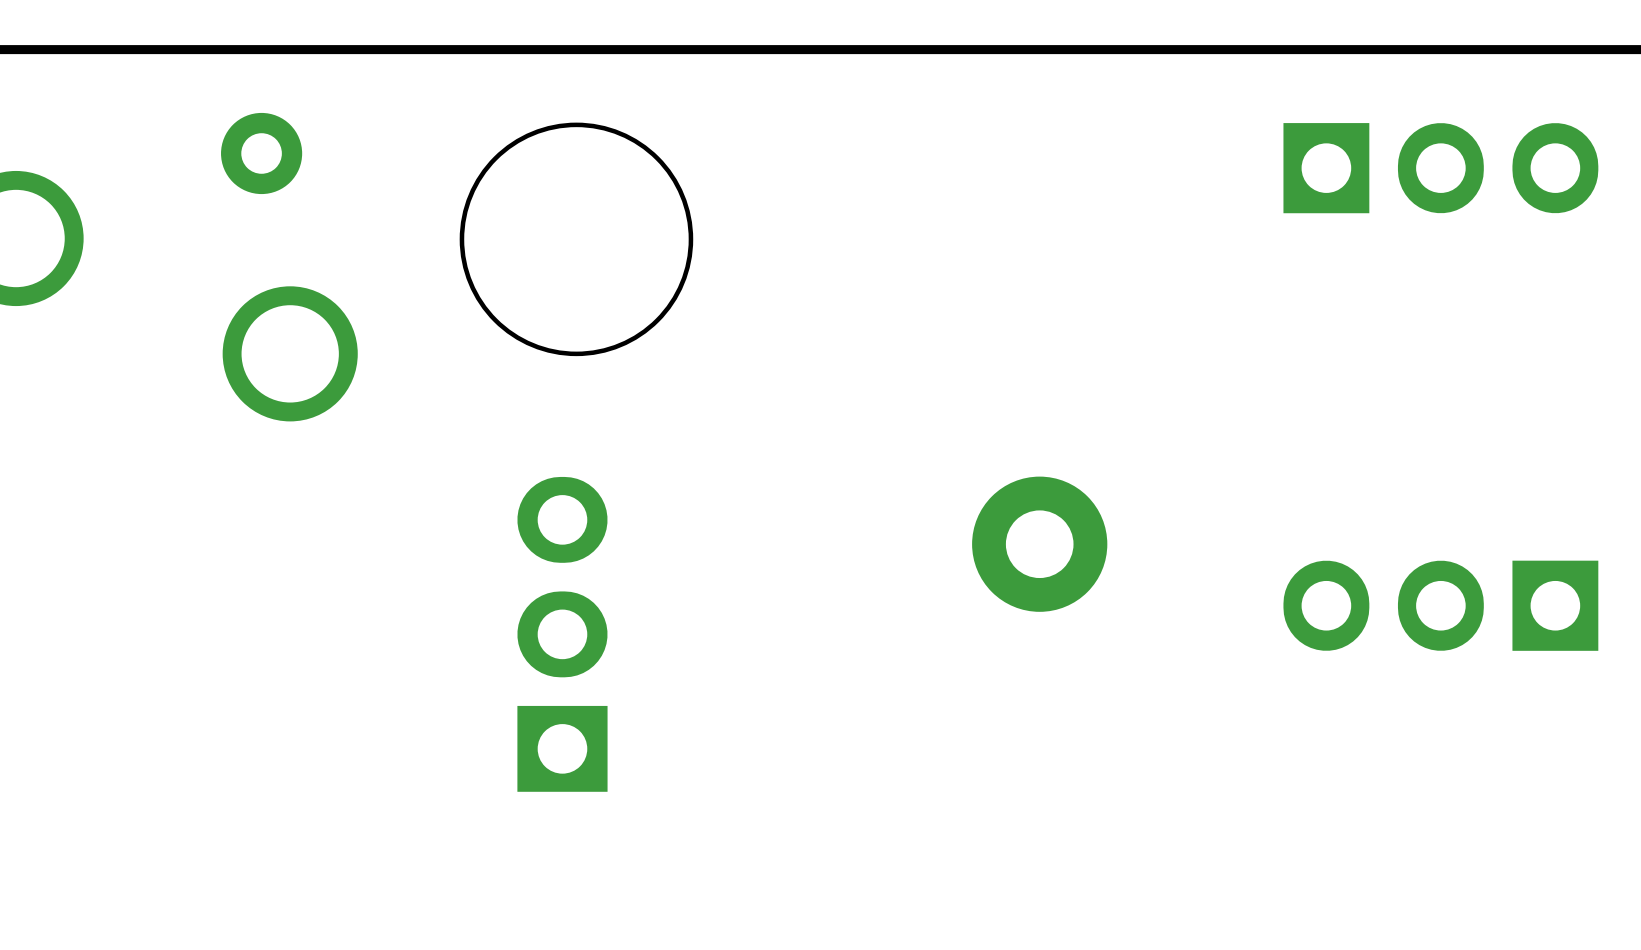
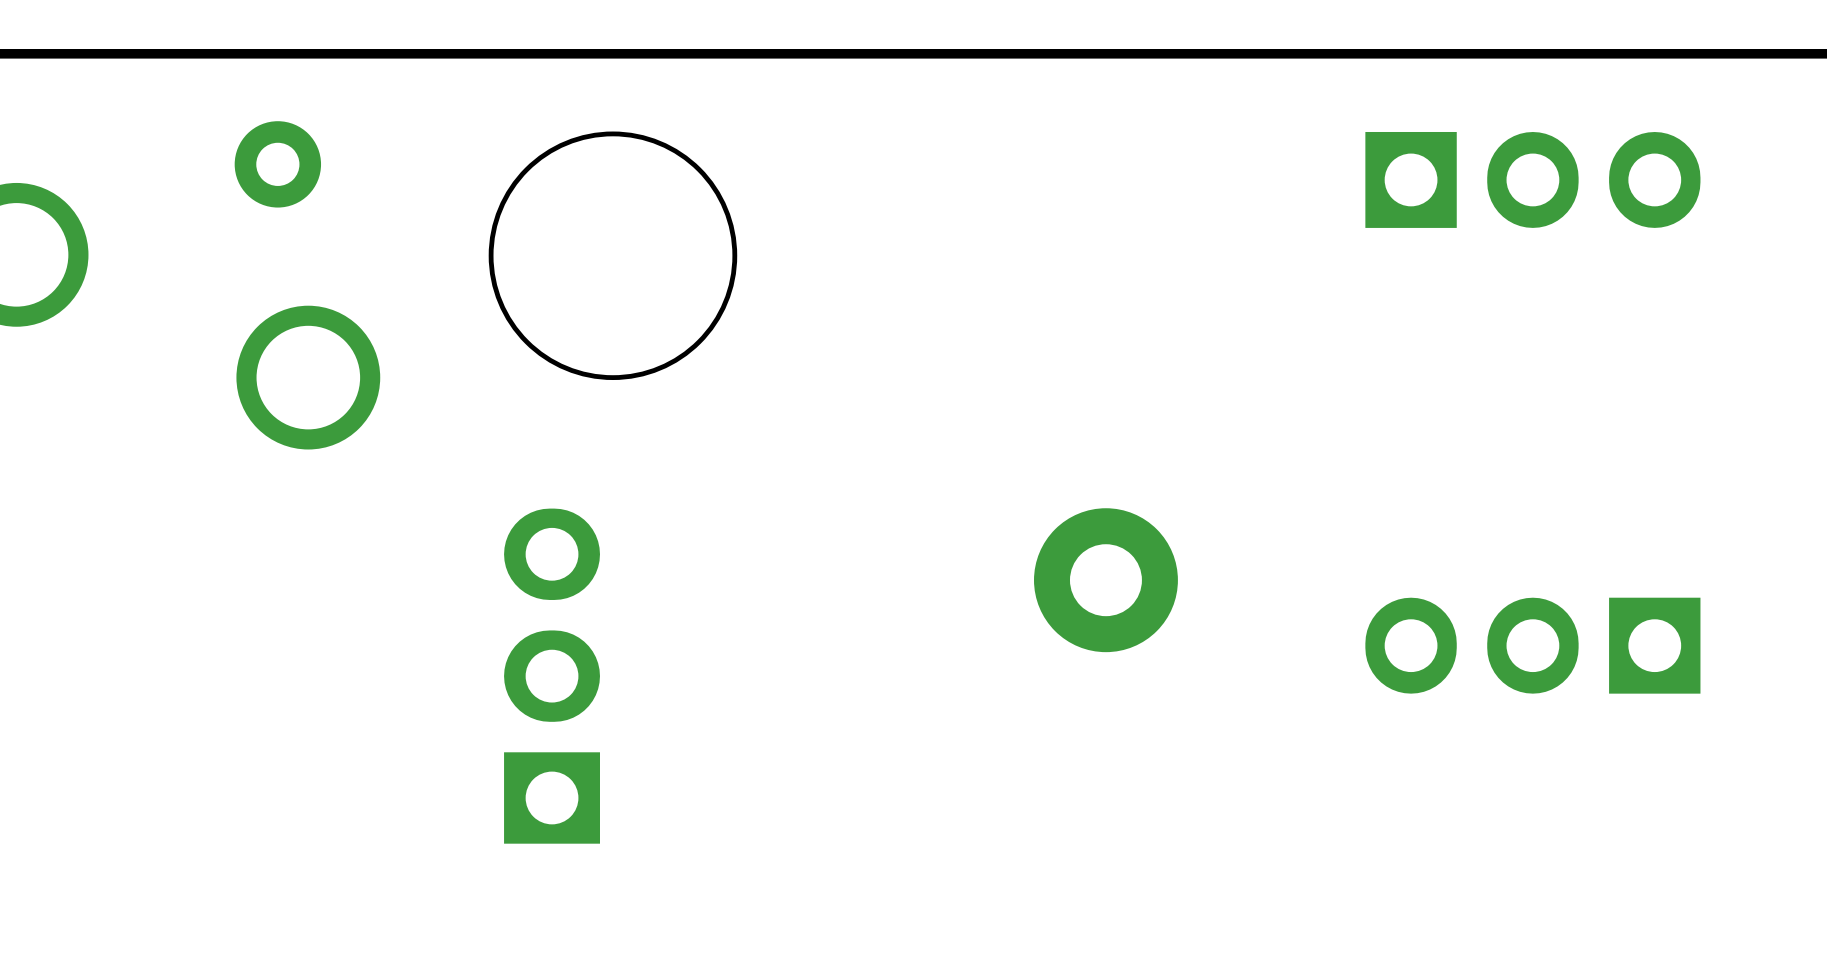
part position: (562, 634) -> (552, 676)

